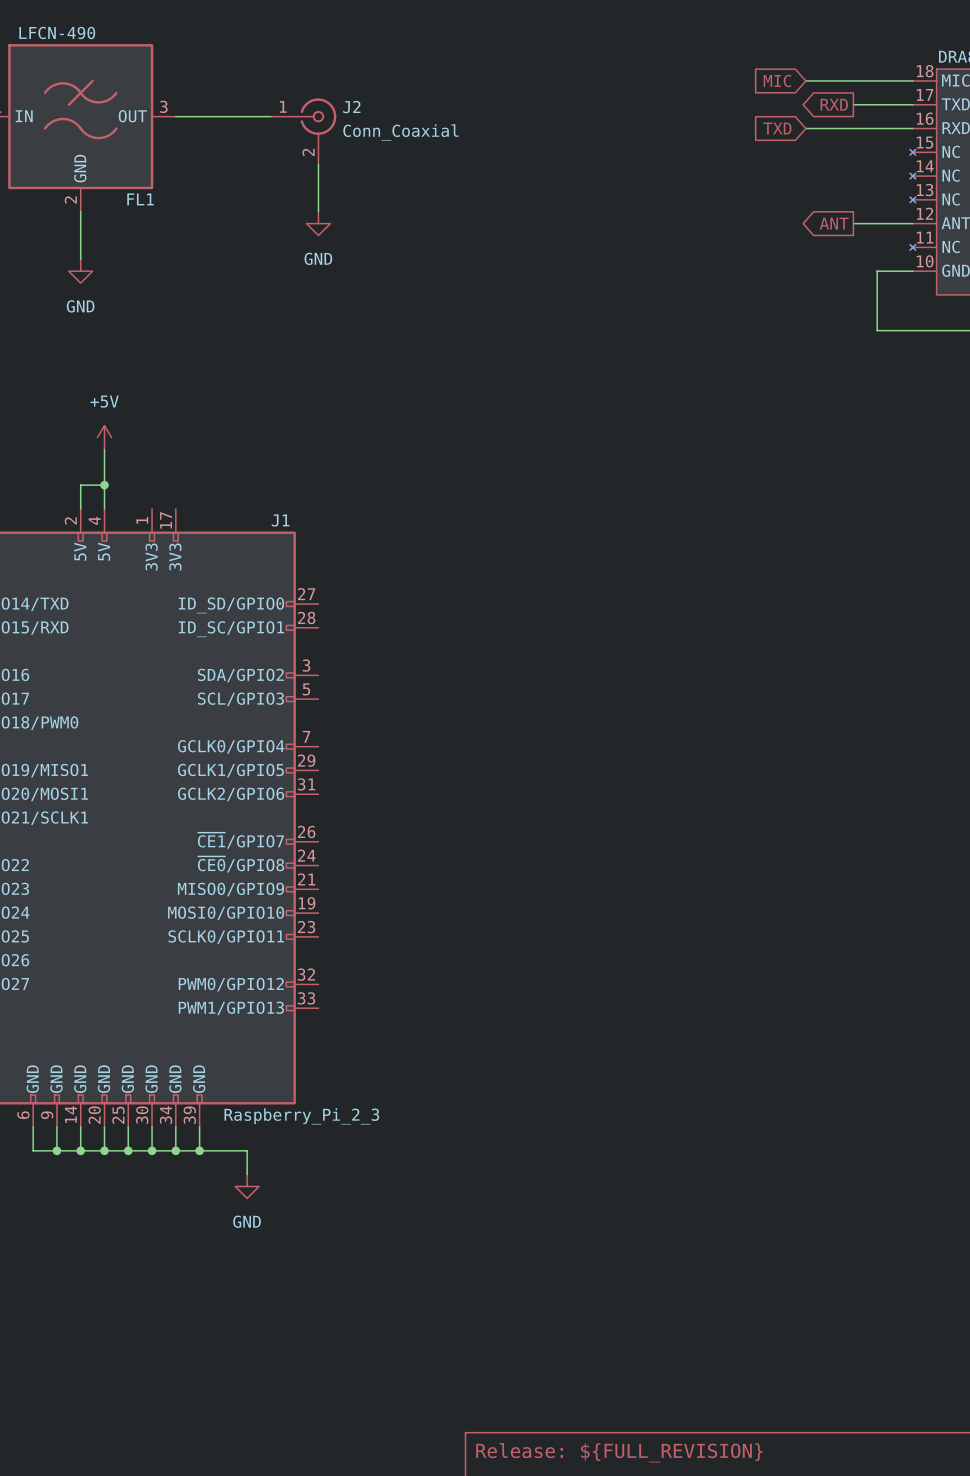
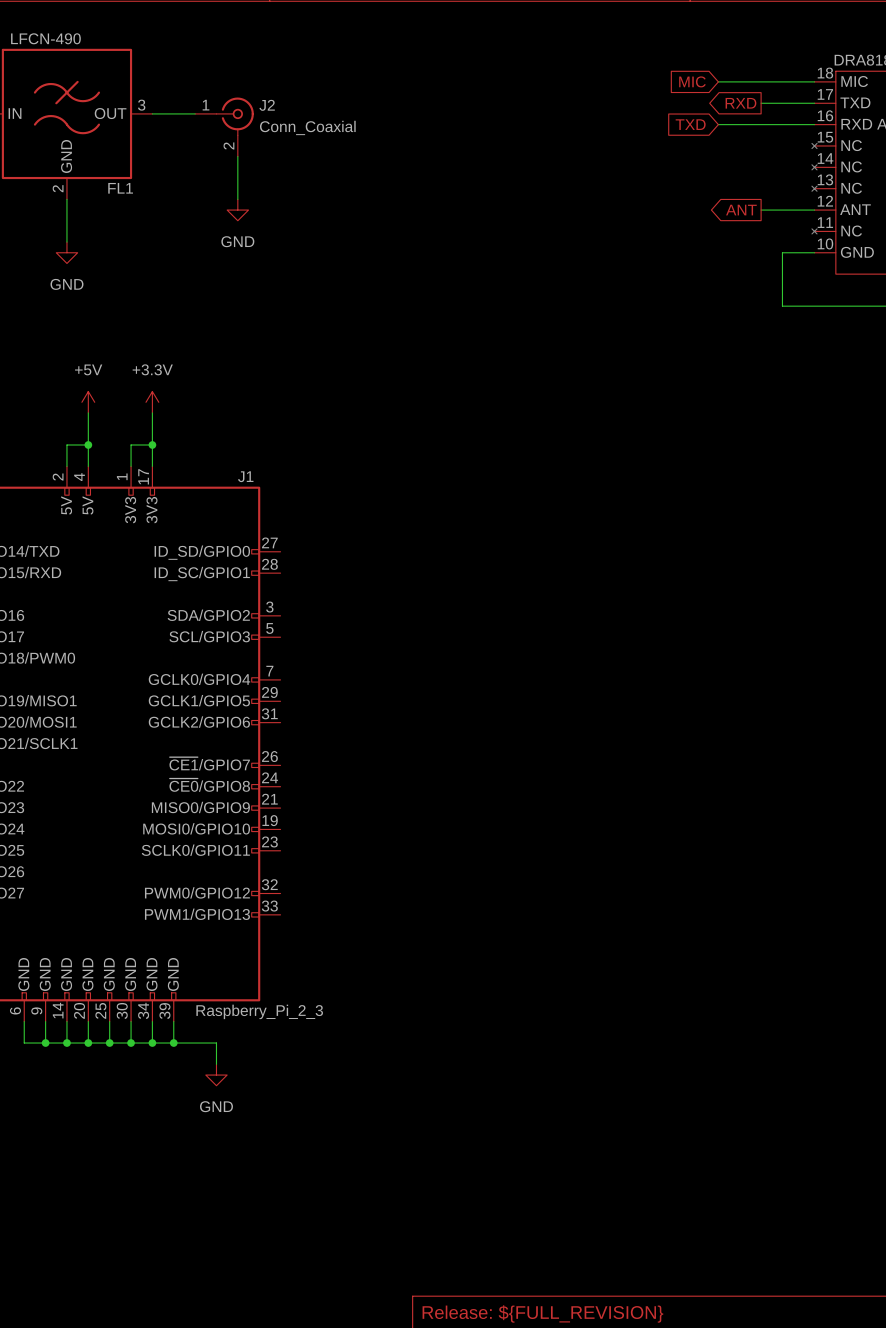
J2 position: (303, 131) -> (224, 127)
wire: (318, 164) (318, 211) -> (237, 156) (237, 199)
power symbol position: GND (318, 223) -> GND (237, 210)
power symbol: none -> +3.3V (152, 402)
wire: none -> (152, 412) (152, 466)
wire: none -> (152, 444) (131, 444) (131, 466)
junction: none -> (152, 444)

